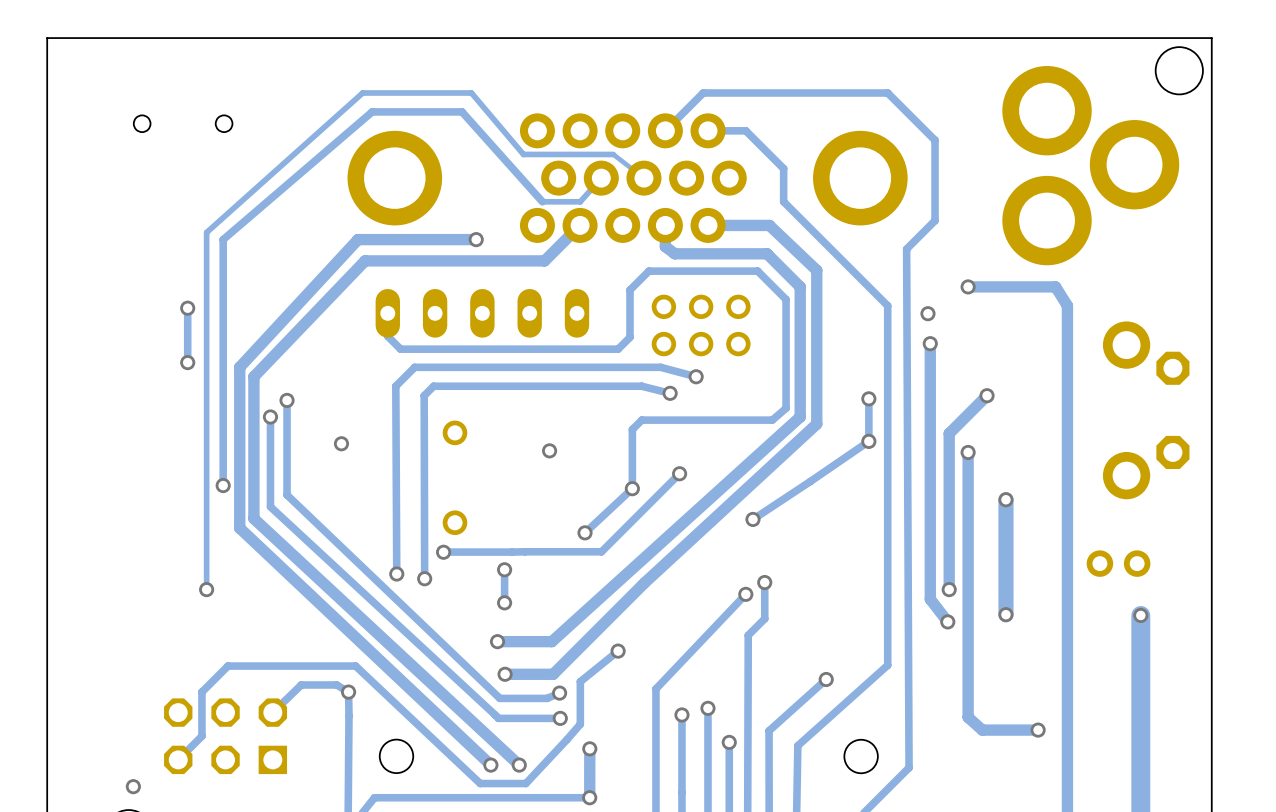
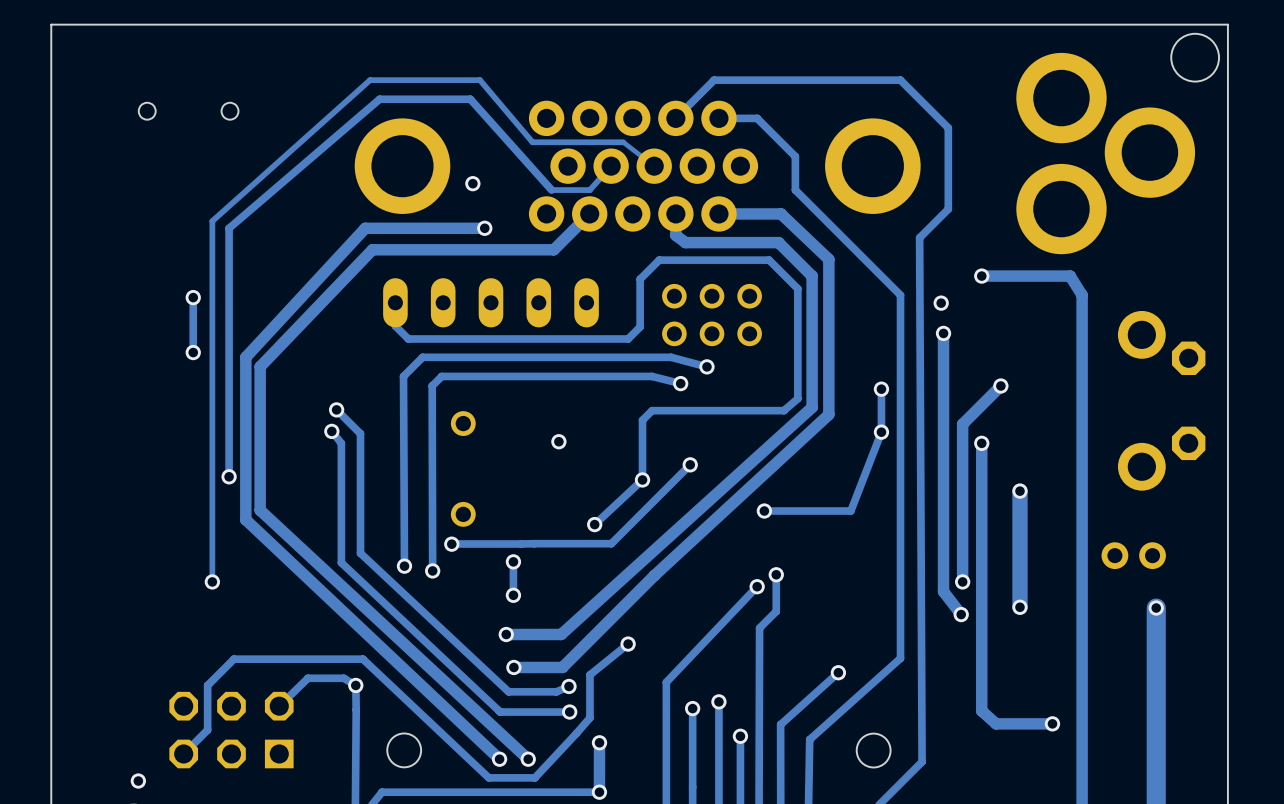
via: none -> (472, 183)
track: (287, 400) (287, 495) (499, 698) -> (336, 409) (360, 433) (360, 553) (508, 691)
via: (287, 400) -> none
track: (270, 416) (270, 506) (498, 718) -> (331, 431) (341, 443) (341, 562) (500, 712) (507, 712)
via: (270, 416) -> none
via: none -> (336, 409)
via: none -> (331, 431)
track: (868, 441) (752, 519) -> (881, 432) (850, 511) (764, 511)
via: (341, 443) -> none

